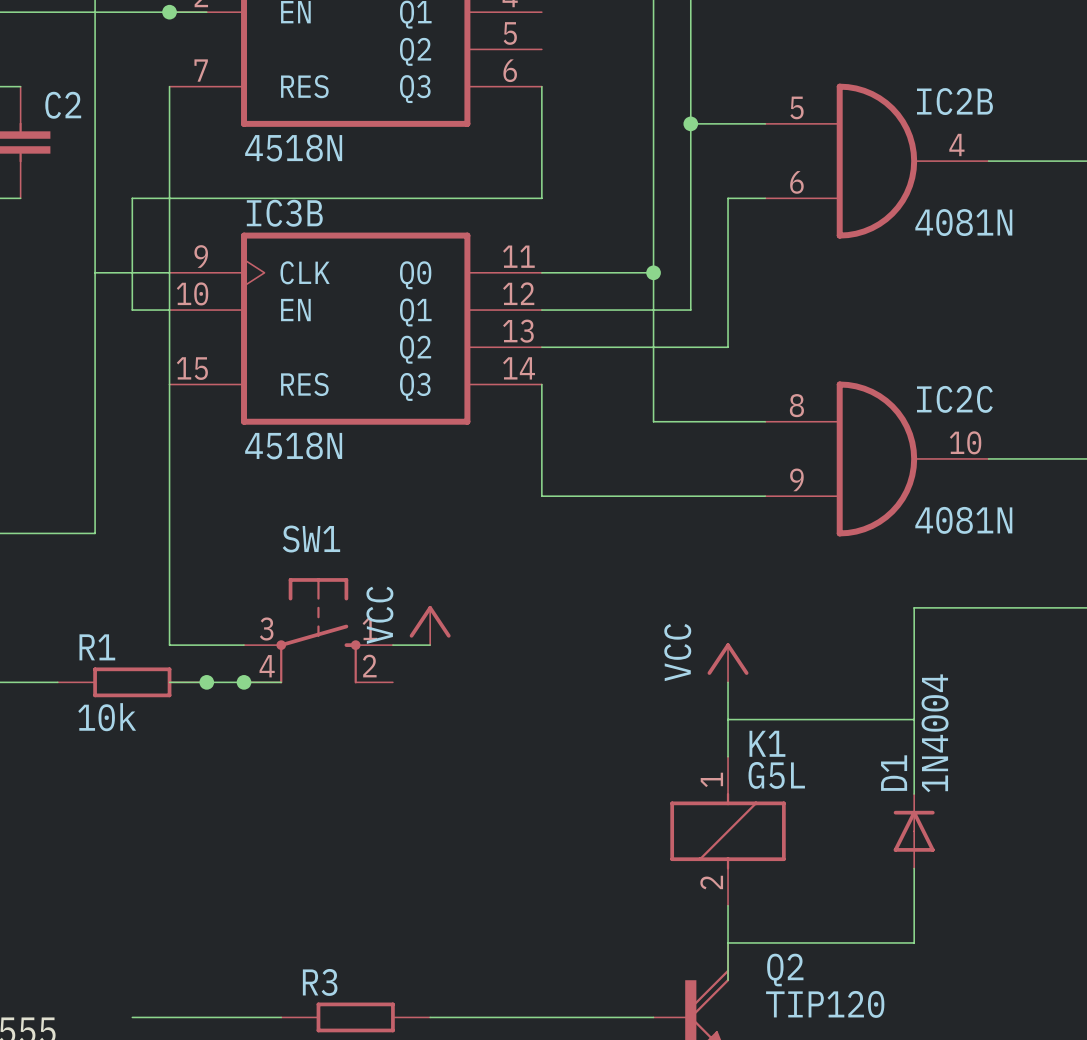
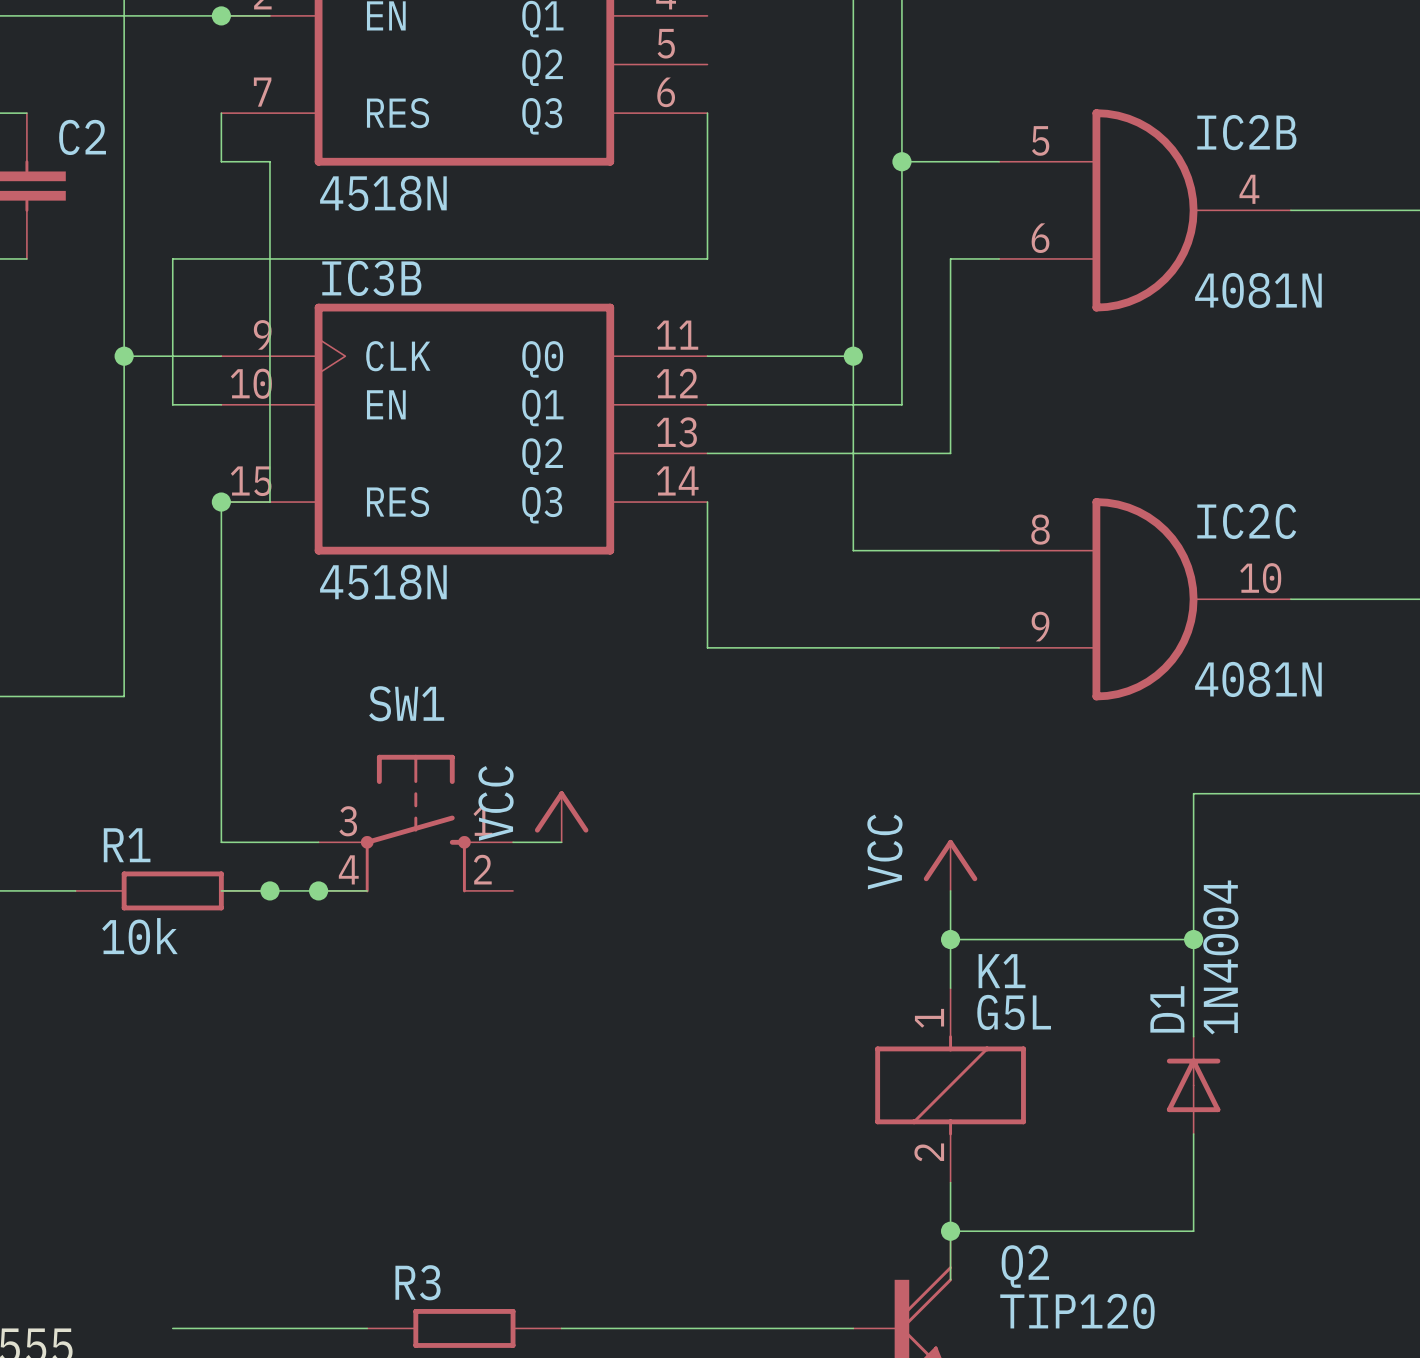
wire: (169, 123) (169, 384) -> (221, 161) (269, 161) (269, 502) (221, 502)
junction: none -> (124, 356)
junction: none -> (221, 502)
junction: none -> (950, 939)
junction: none -> (1193, 939)
junction: none -> (950, 1231)

